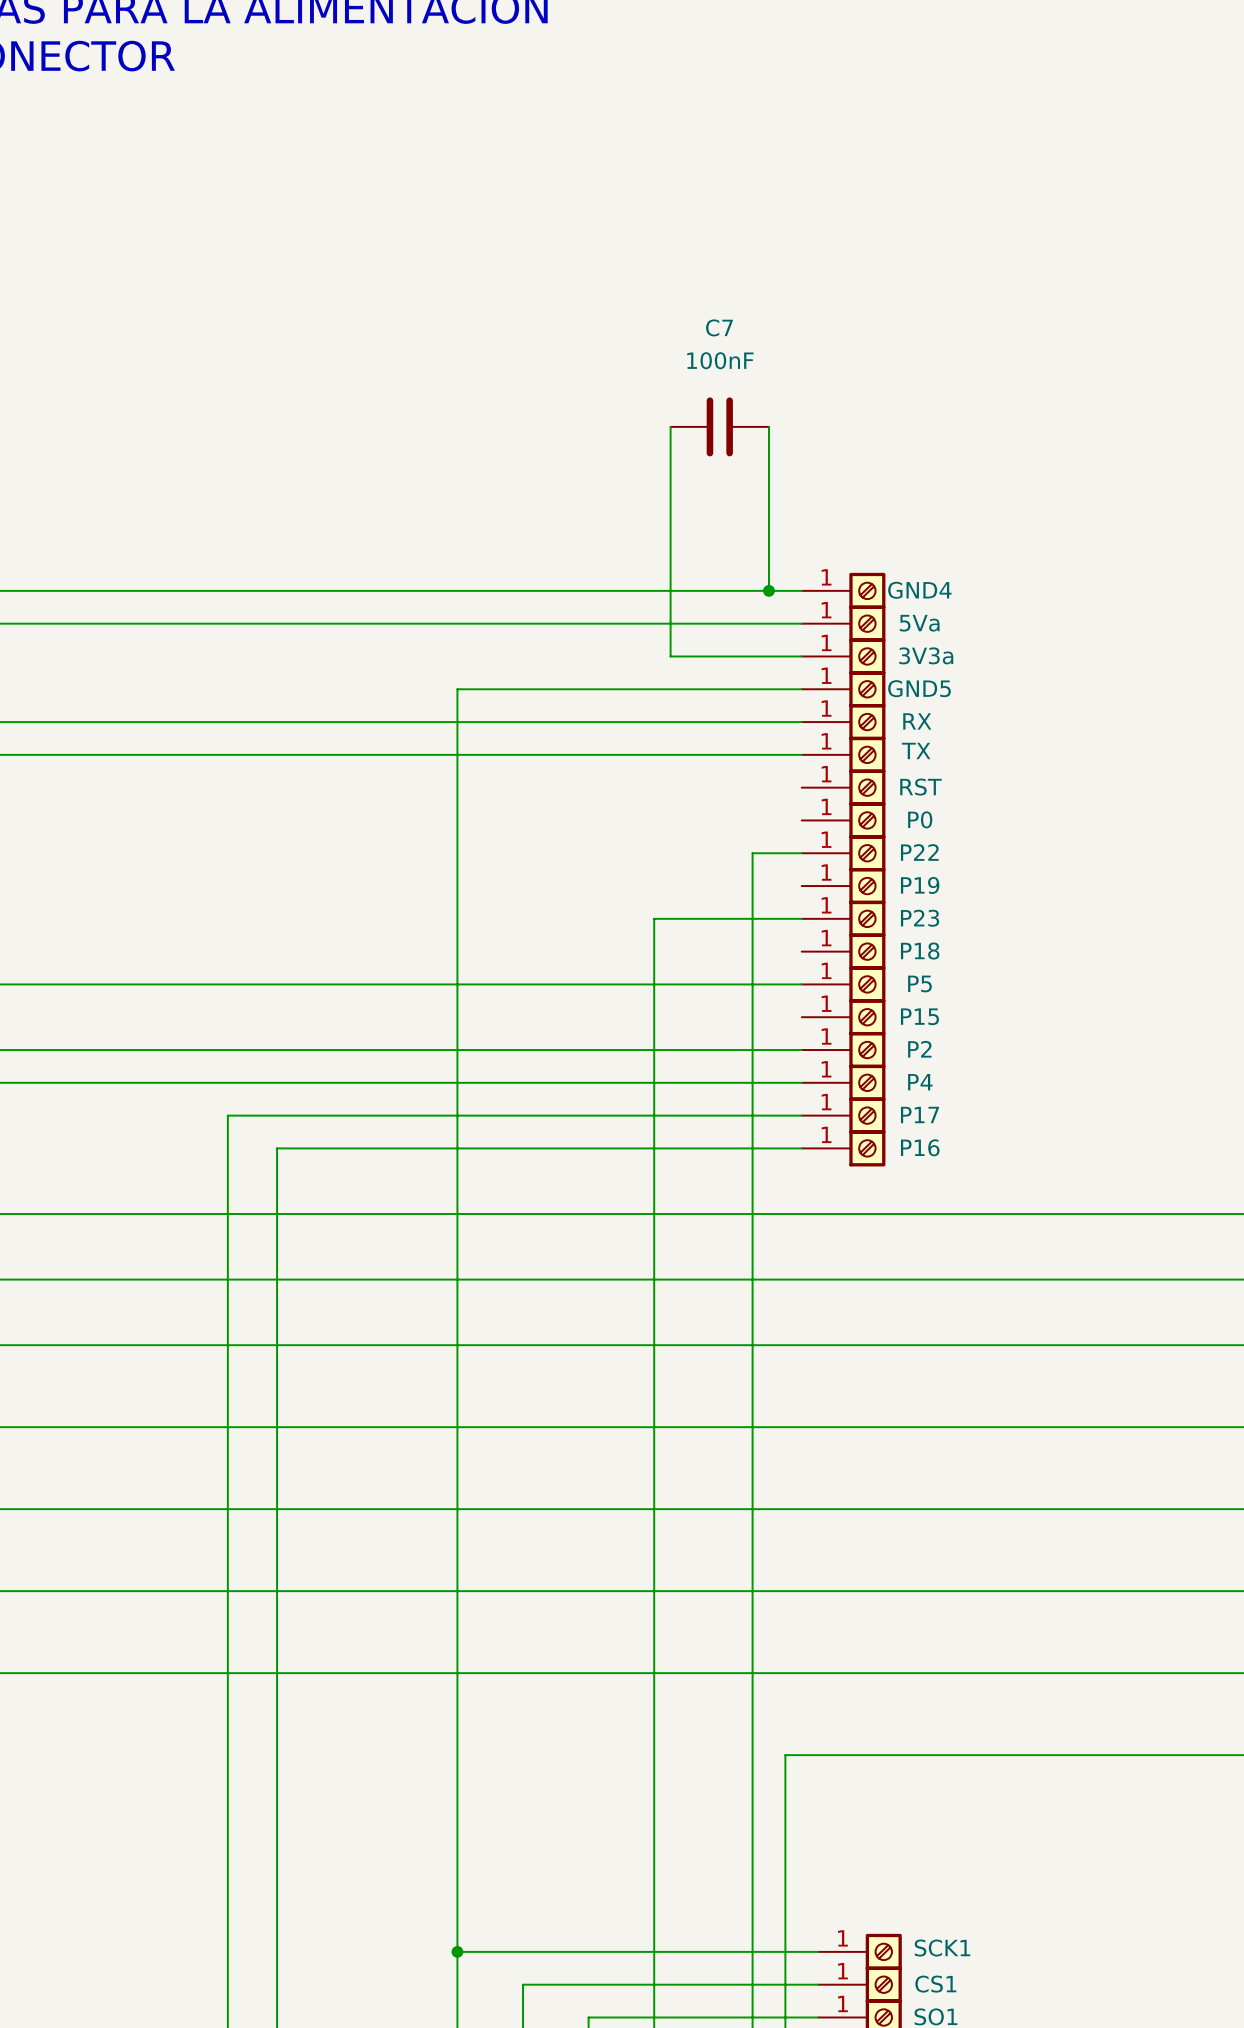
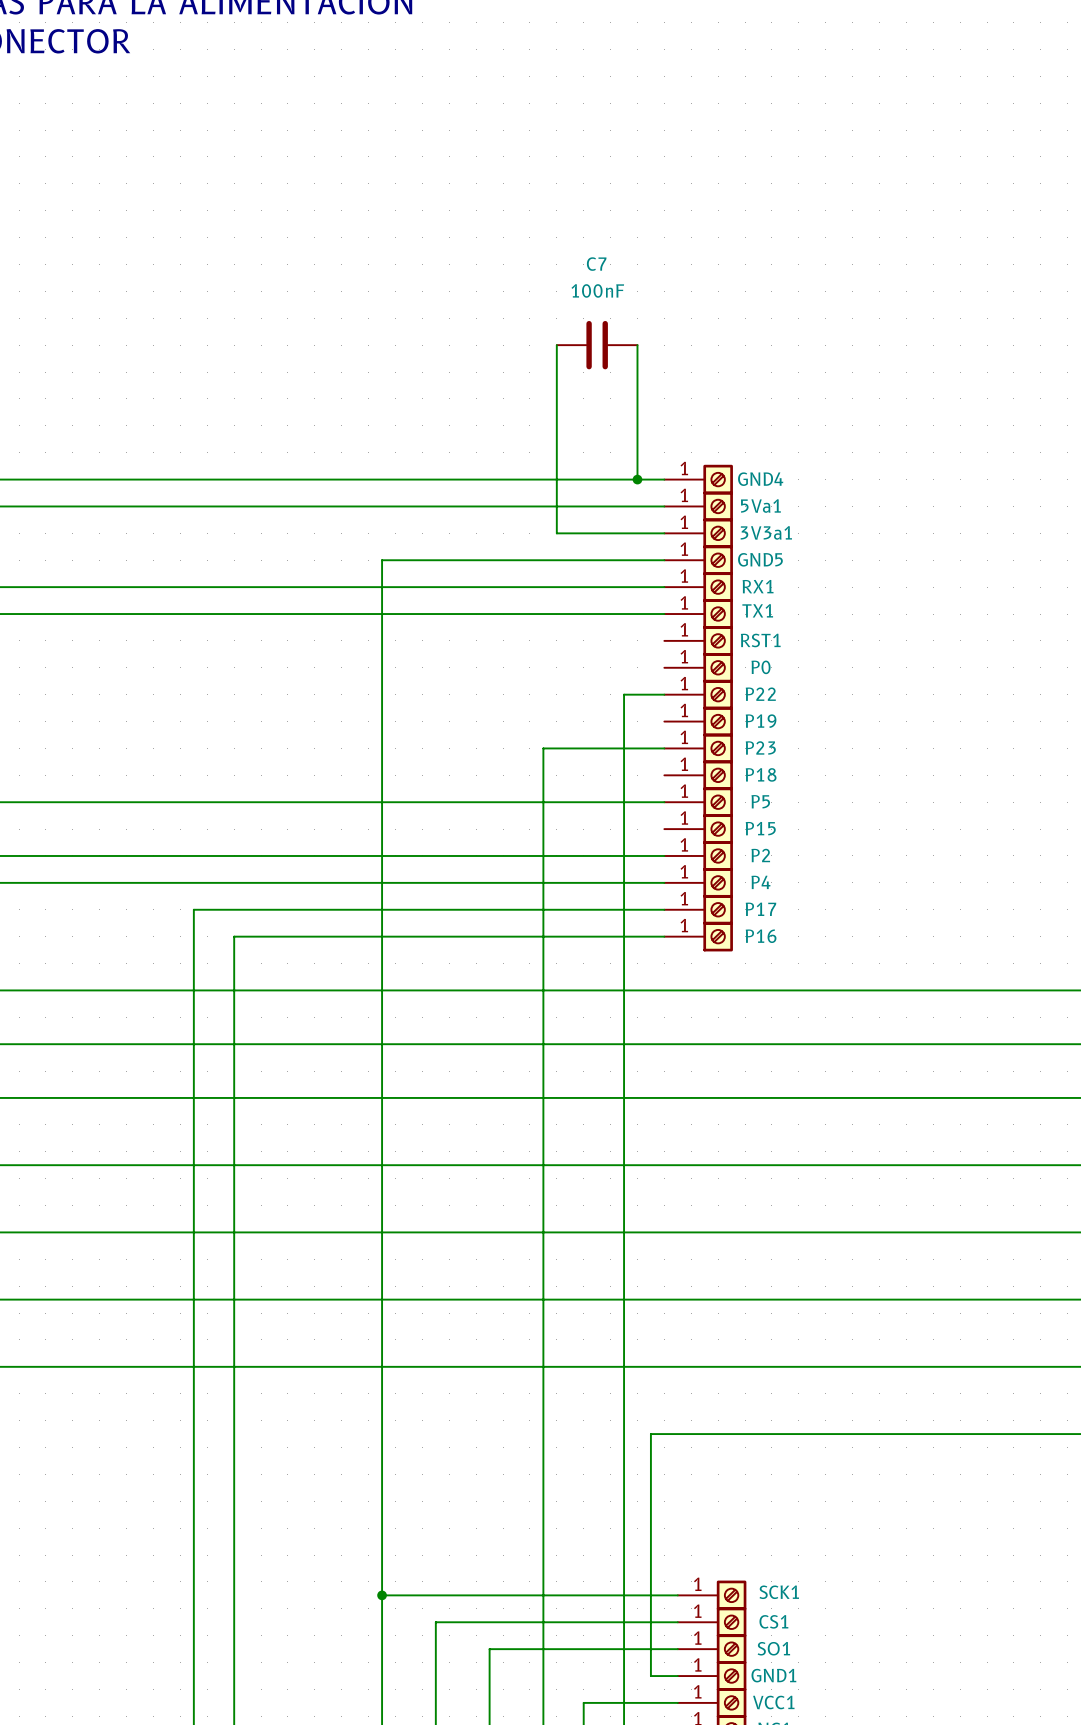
5Va name: 5Va (919, 623) -> 5Va1 (760, 506)
3V3a name: 3V3a (926, 655) -> 3V3a1 (766, 532)
RX name: RX (917, 721) -> RX1 (758, 586)
TX name: TX (916, 750) -> TX1 (757, 610)
RST name: RST (920, 787) -> RST1 (760, 640)

